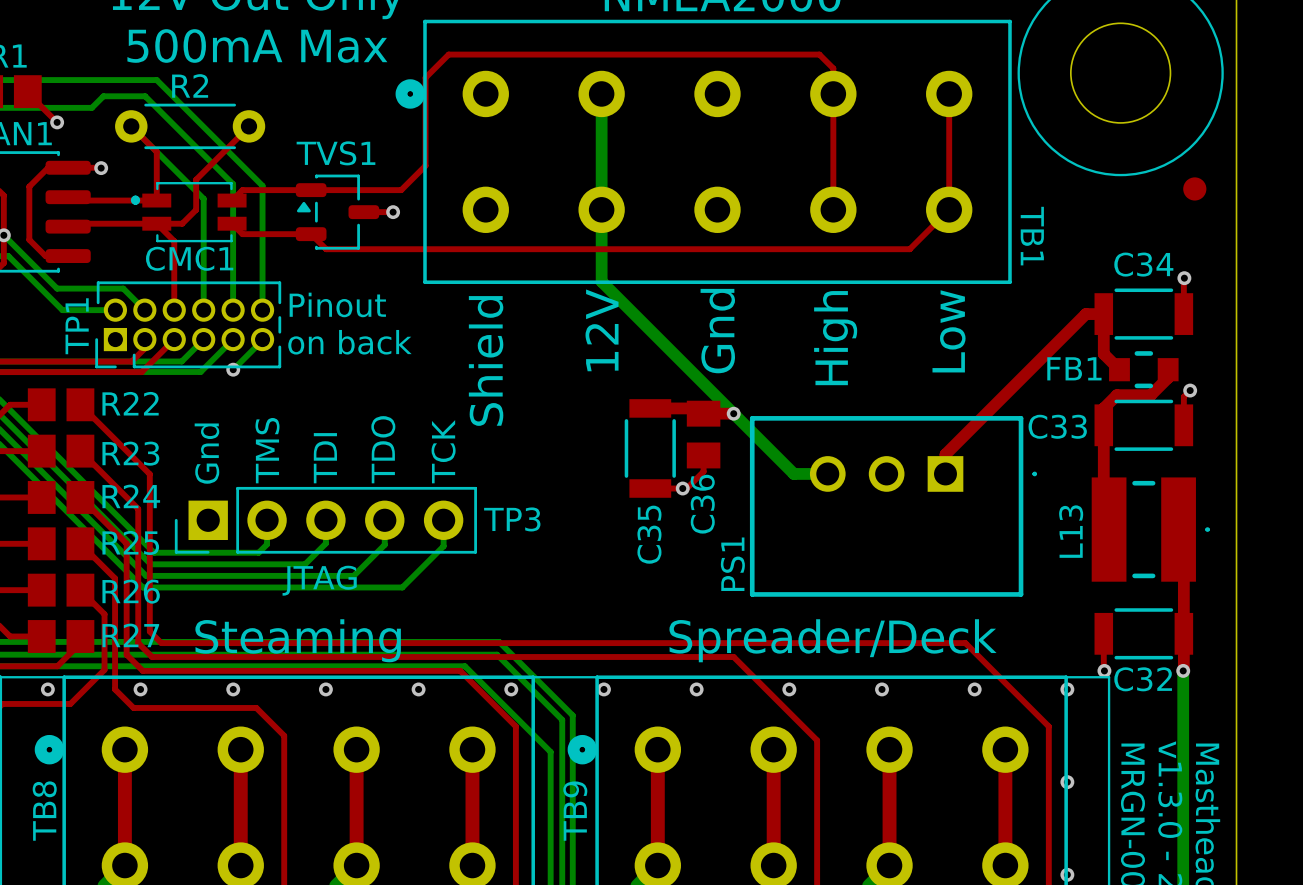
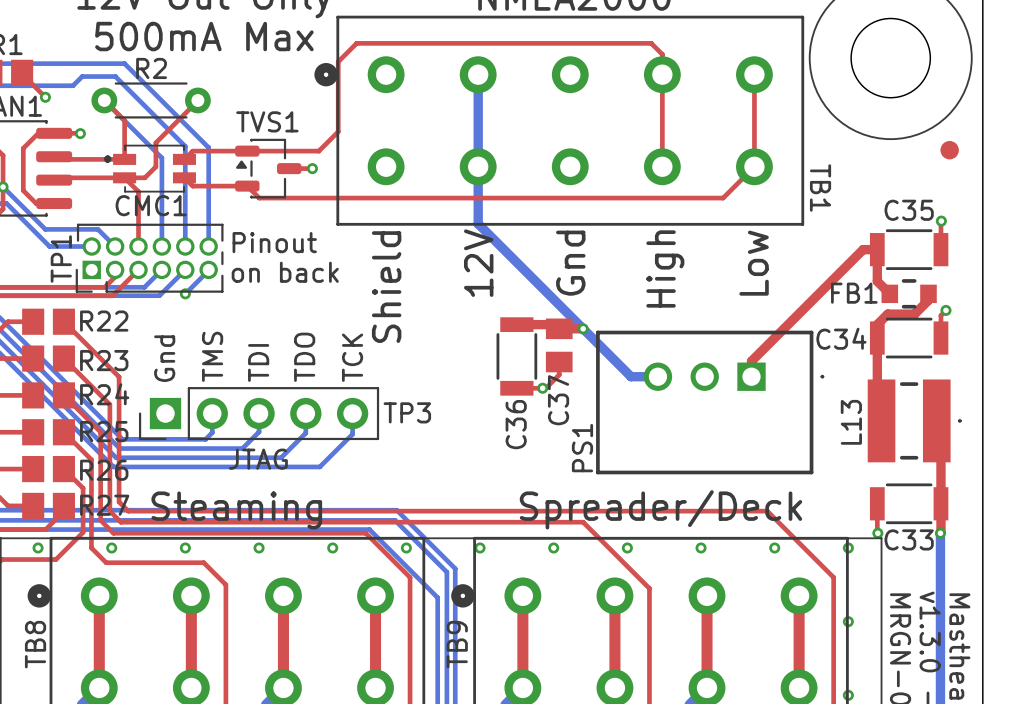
C34 name: C34 (1143, 264) -> C35 (909, 210)
C33 name: C33 (1057, 426) -> C34 (841, 338)
C36 name: C36 (702, 504) -> C37 (558, 400)
C35 name: C35 (649, 534) -> C36 (516, 424)
C32 name: C32 (1143, 679) -> C33 (909, 539)

